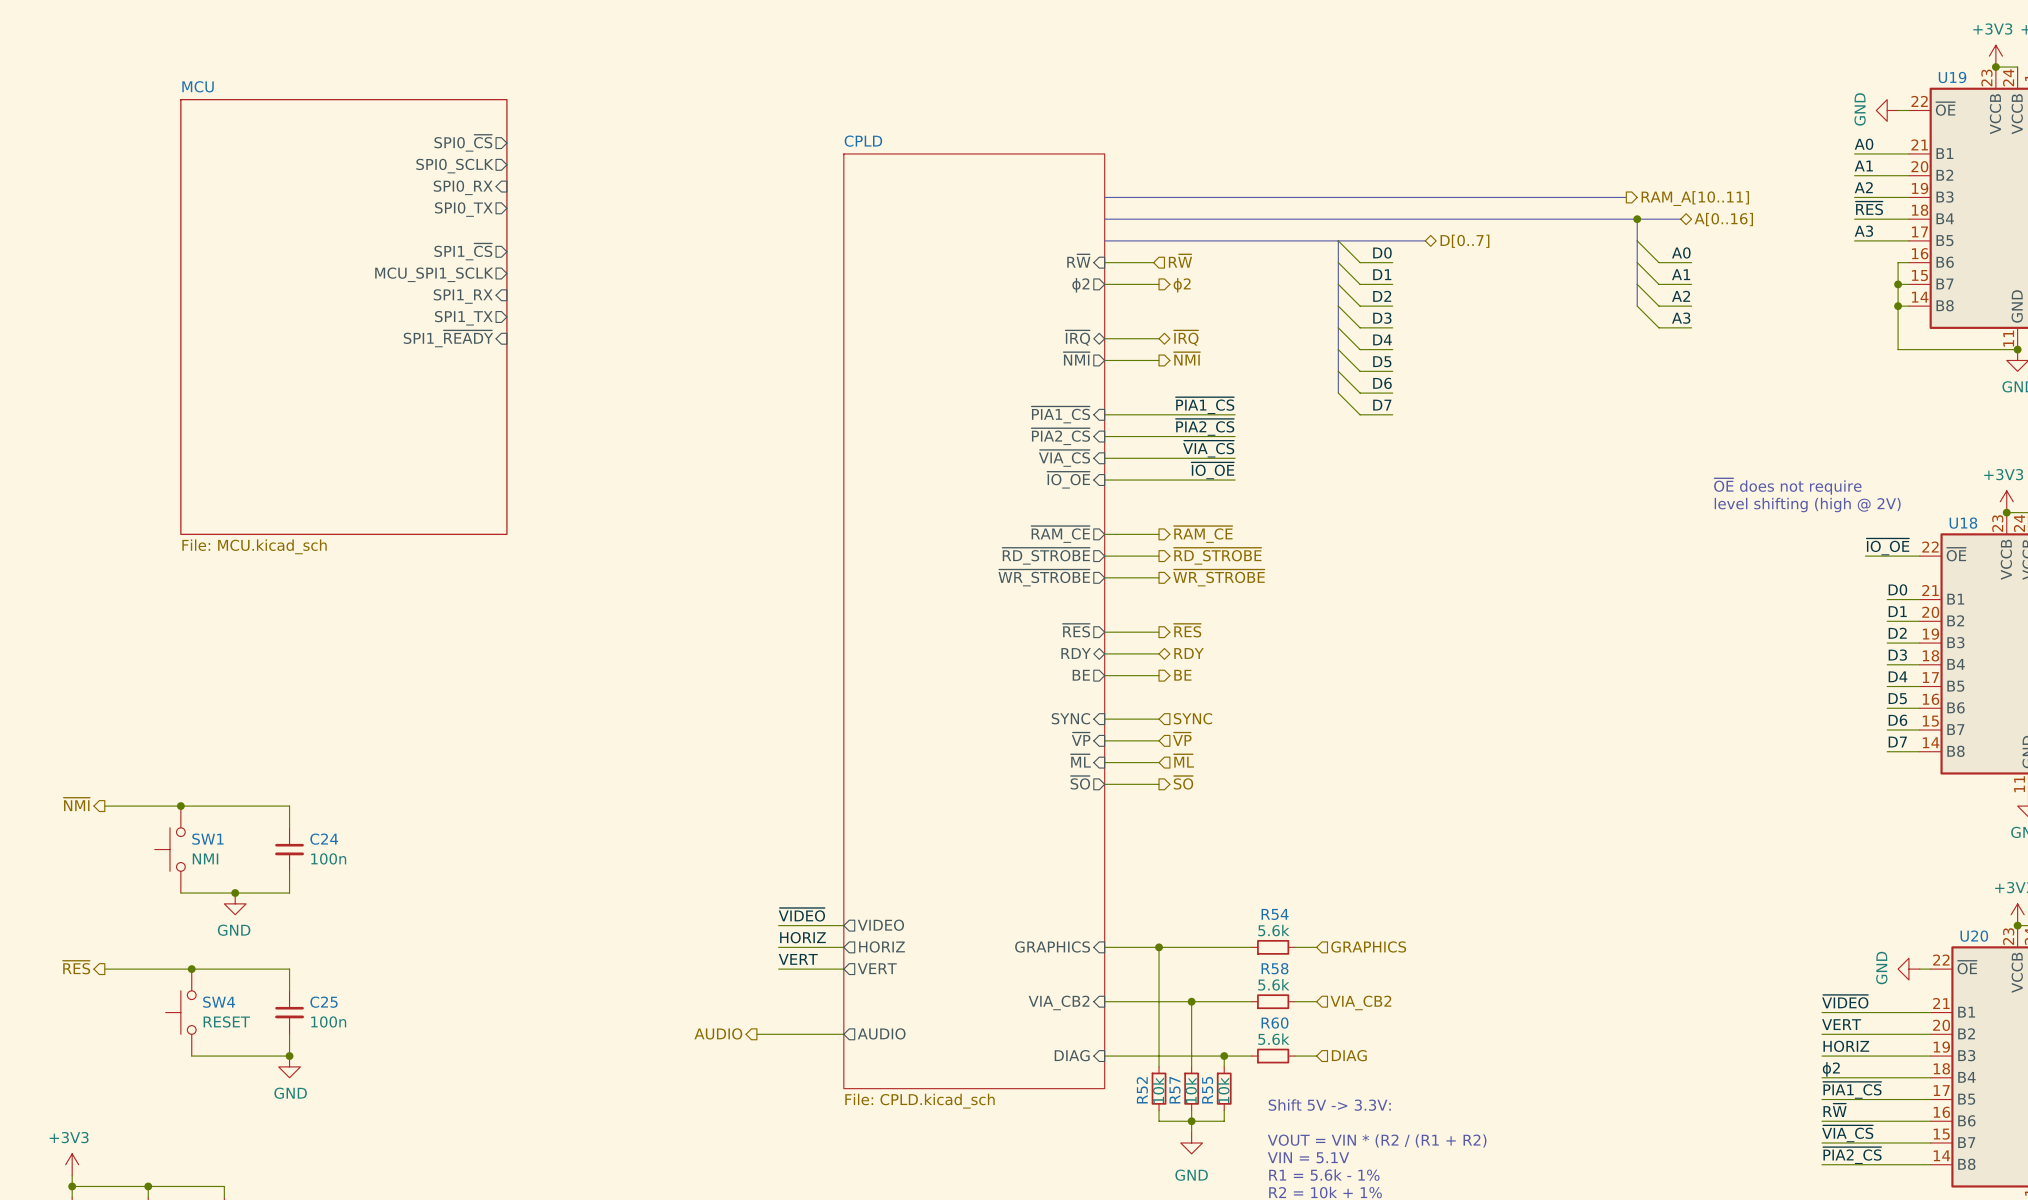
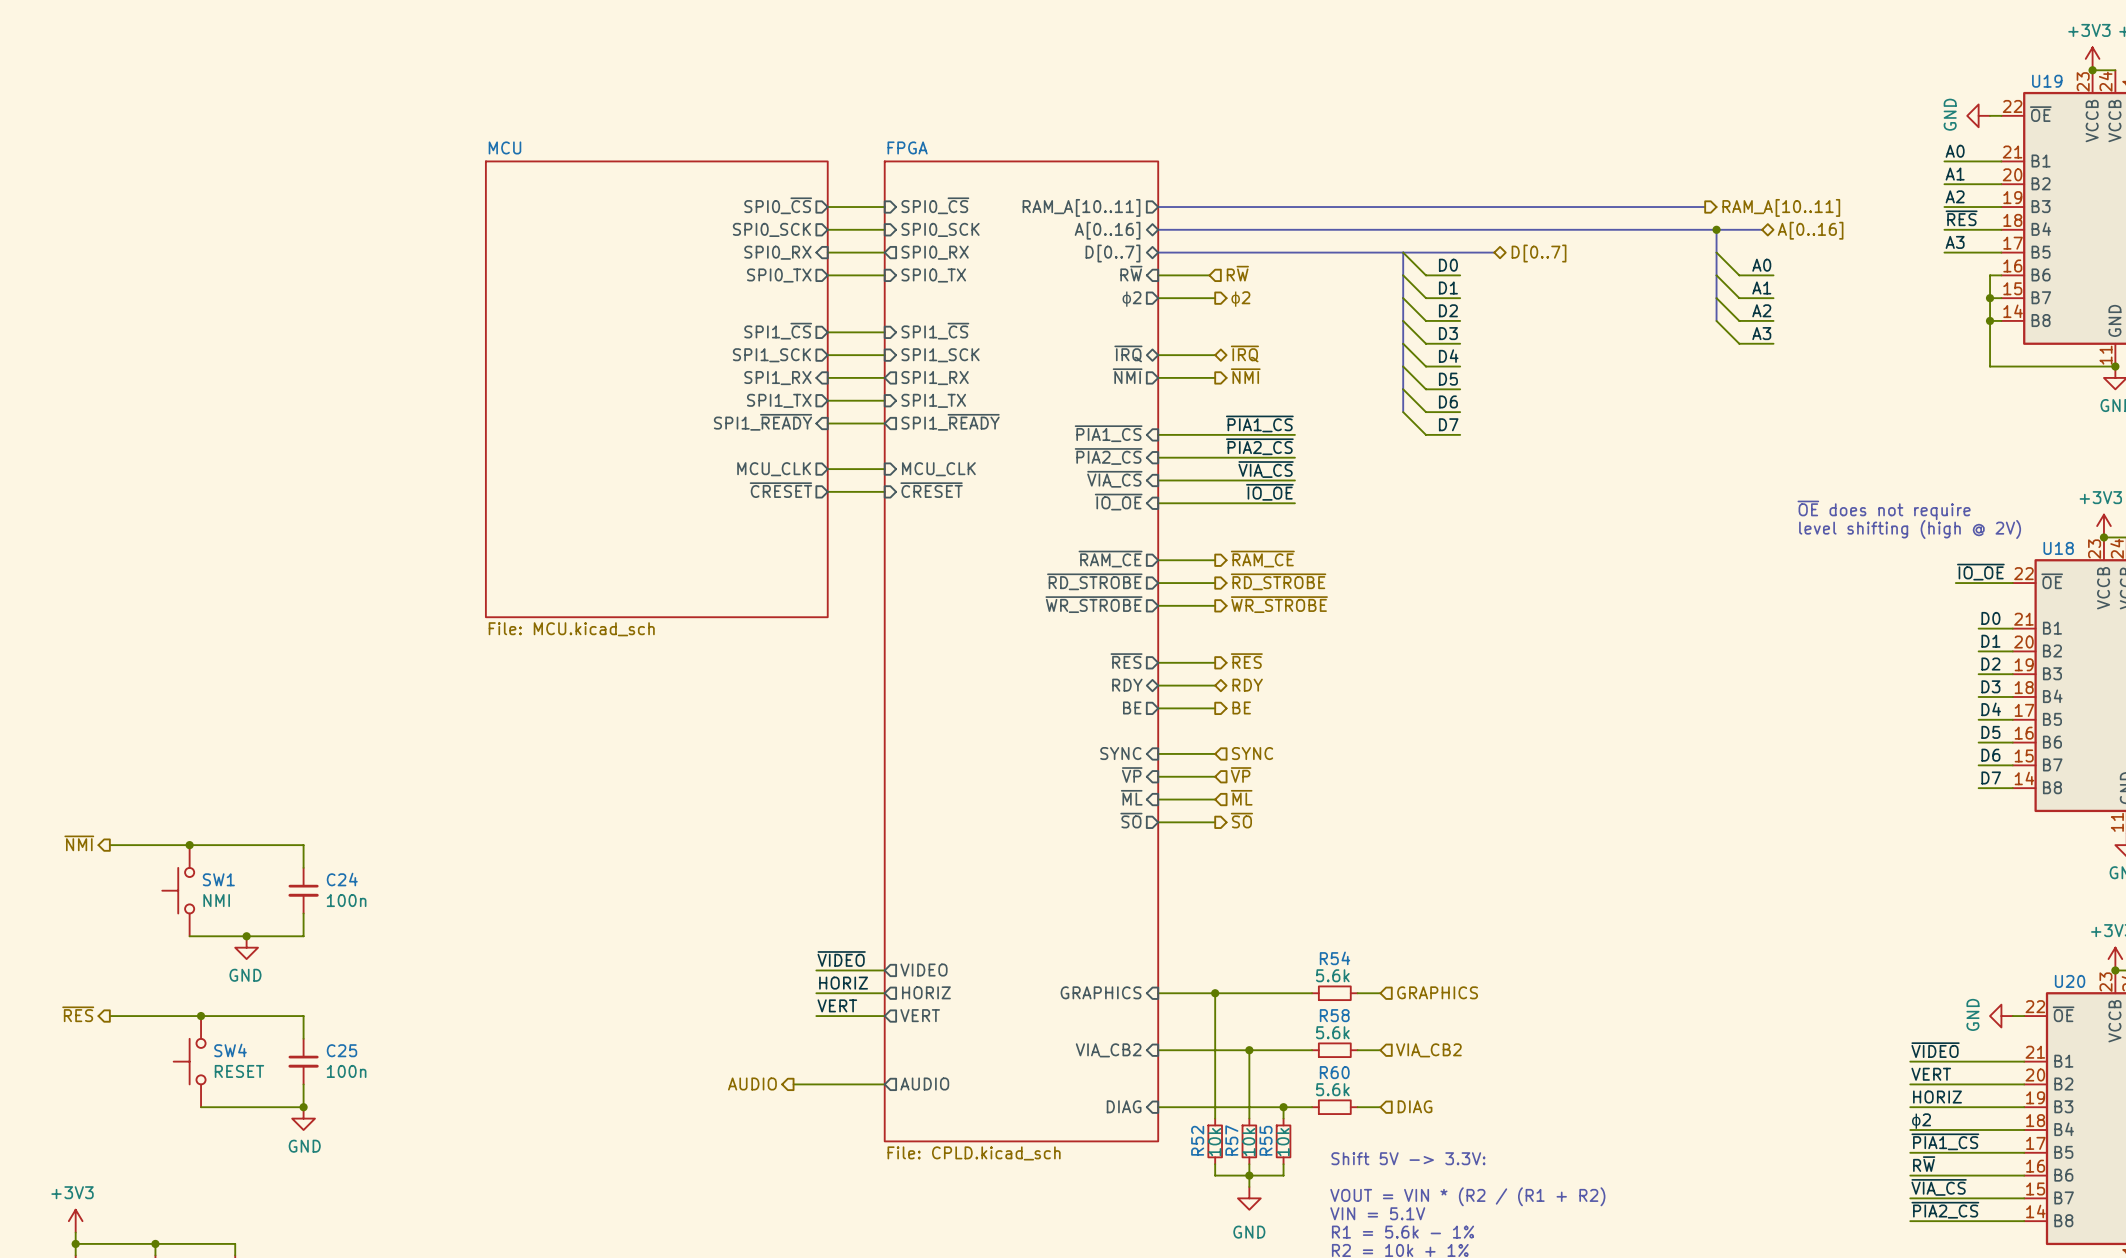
sheet CPLD name: CPLD (863, 141) -> FPGA (907, 147)
sheet pin: SPI0_~{CS} (463, 143) -> none
sheet pin: SPI0_SCLK (454, 166) -> none
sheet pin: SPI0_RX (463, 187) -> none
sheet pin: none -> SPI0_~{CS} (778, 205)
wire: none -> (827, 207) (884, 207)
sheet pin: none -> SPI0_~{CS} (935, 205)
sheet pin: none -> RAM_A[10..11] (1081, 207)
sheet pin: SPI0_TX (463, 209) -> none
wire: none -> (827, 229) (884, 229)
sheet pin: none -> A[0..16] (1107, 230)
sheet pin: none -> SPI0_SCK (771, 229)
sheet pin: none -> SPI0_SCK (940, 229)
wire: none -> (827, 252) (884, 252)
sheet pin: none -> D[0..7] (1112, 253)
sheet pin: none -> SPI0_RX (777, 252)
sheet pin: none -> SPI0_RX (935, 252)
sheet pin: SPI1_~{CS} (463, 251) -> none
wire: none -> (827, 275) (884, 275)
sheet pin: none -> SPI0_TX (779, 275)
sheet pin: none -> SPI0_TX (933, 275)
sheet pin: MCU_SPI1_SCLK (434, 274) -> none
sheet pin: SPI1_RX (463, 296) -> none
sheet MCU: File: MCU.kicad_sch (343, 316) -> none
wire: none -> (827, 332) (884, 332)
sheet pin: none -> SPI1_~{CS} (778, 331)
sheet pin: none -> SPI1_~{CS} (935, 331)
sheet pin: SPI1_TX (463, 318) -> none
sheet pin: SPI1_~{READY} (448, 338) -> none
wire: none -> (827, 355) (884, 355)
sheet pin: none -> SPI1_SCK (771, 355)
sheet pin: none -> SPI1_SCK (940, 355)
wire: none -> (827, 377) (884, 377)
sheet pin: none -> SPI1_RX (777, 378)
sheet pin: none -> SPI1_RX (935, 378)
sheet MCU: none -> File: MCU.kicad_sch (656, 389)
wire: none -> (827, 400) (884, 400)
sheet pin: none -> SPI1_TX (779, 400)
sheet pin: none -> SPI1_TX (933, 400)
wire: none -> (827, 423) (884, 423)
sheet pin: none -> SPI1_~{READY} (763, 422)
sheet pin: none -> SPI1_~{READY} (950, 422)
wire: none -> (827, 469) (884, 469)
sheet pin: none -> MCU_CLK (774, 469)
sheet pin: none -> MCU_CLK (938, 469)
sheet pin: none -> ~{CRESET} (780, 490)
sheet pin: none -> ~{CRESET} (931, 490)
wire: none -> (827, 491) (884, 491)

